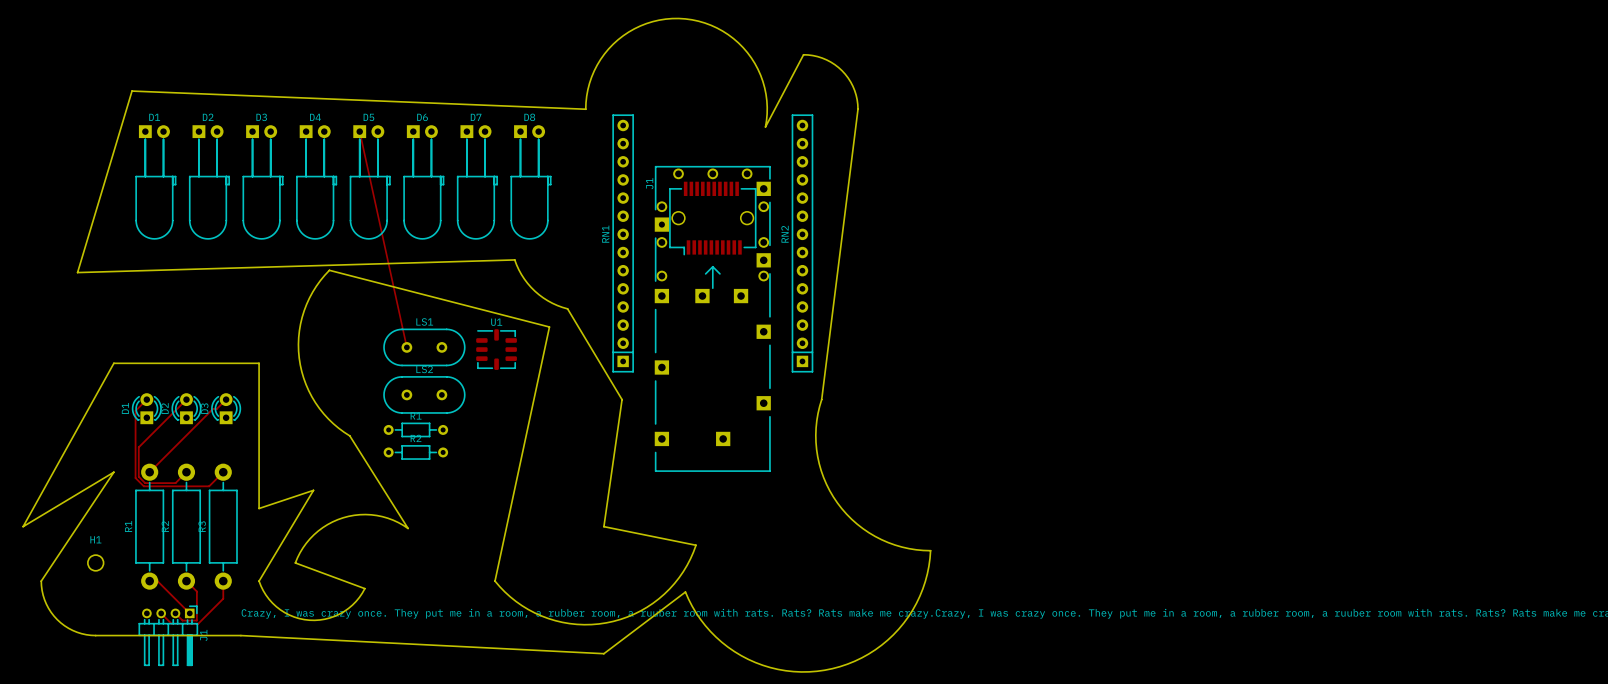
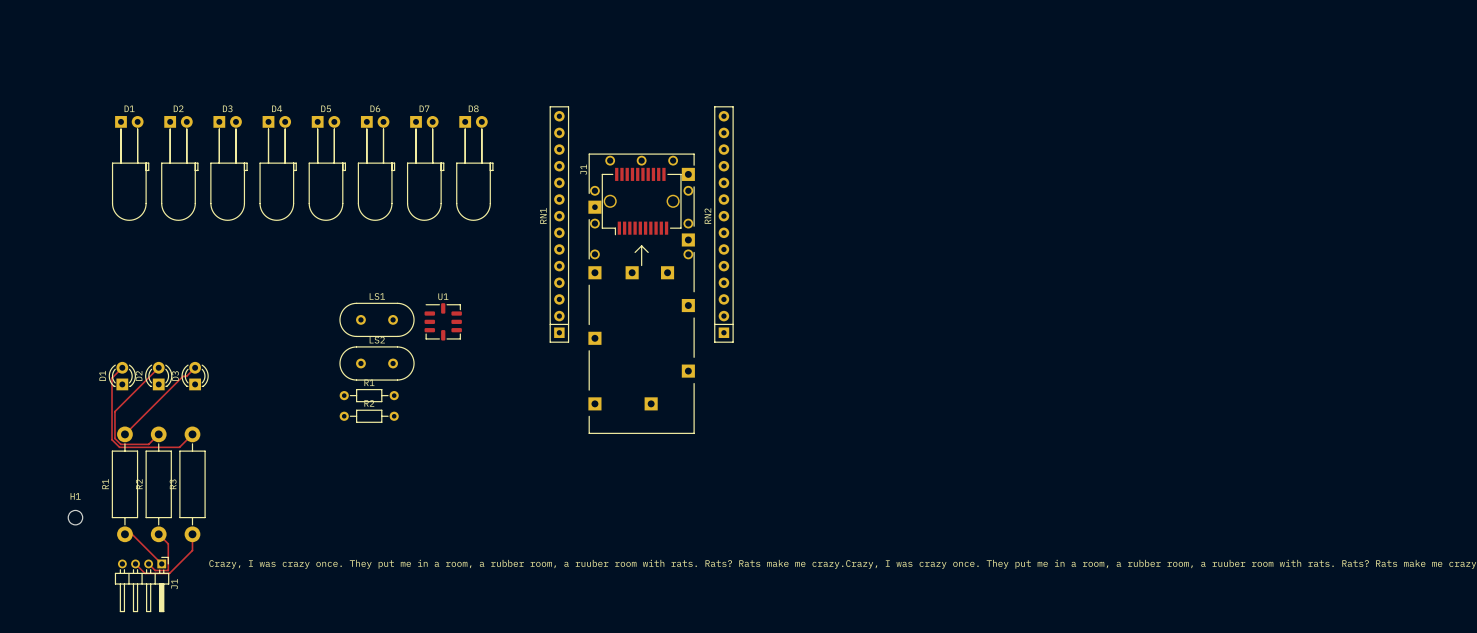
board edge: (803, 54) (765, 127) (767, 107) (764, 87) (757, 69) (747, 52) (733, 38) (716, 27) (698, 21) (678, 18) (659, 20) (640, 25) (613, 44) (600, 59) (591, 77) (585, 109) (132, 91) (77, 272) (514, 259) (521, 274) (534, 291) (547, 300) (567, 308) (622, 399) (603, 526) (696, 545) (683, 571) (664, 593) (647, 607) (620, 619) (591, 624) (562, 622) (541, 615) (516, 601) (495, 581) (549, 327) (329, 270) (309, 298) (300, 323) (298, 351) (303, 378) (311, 396) (323, 413) (349, 435) (408, 528) (393, 520) (376, 515) (359, 514) (343, 517) (327, 524) (313, 534) (303, 547) (295, 562) (364, 588) (359, 597) (348, 608) (334, 616) (319, 620) (304, 619) (289, 615) (276, 606) (260, 585) (259, 581) (313, 490) (259, 508) (259, 363) (113, 363) (23, 526) (113, 472) (41, 581) (43, 595) (51, 612) (68, 628) (90, 635) (240, 635) (603, 653) (685, 592) (700, 619) (716, 637) (741, 655) (770, 667) (801, 671) (824, 670) (854, 661) (881, 645) (898, 629) (916, 603) (927, 573) (930, 550) (909, 548) (888, 542) (857, 524) (833, 497) (819, 463) (816, 442) (816, 420) (821, 399) (858, 109) (854, 90) (842, 70) (822, 58) (803, 54) -> none
track: (359, 131) (406, 347) -> none

